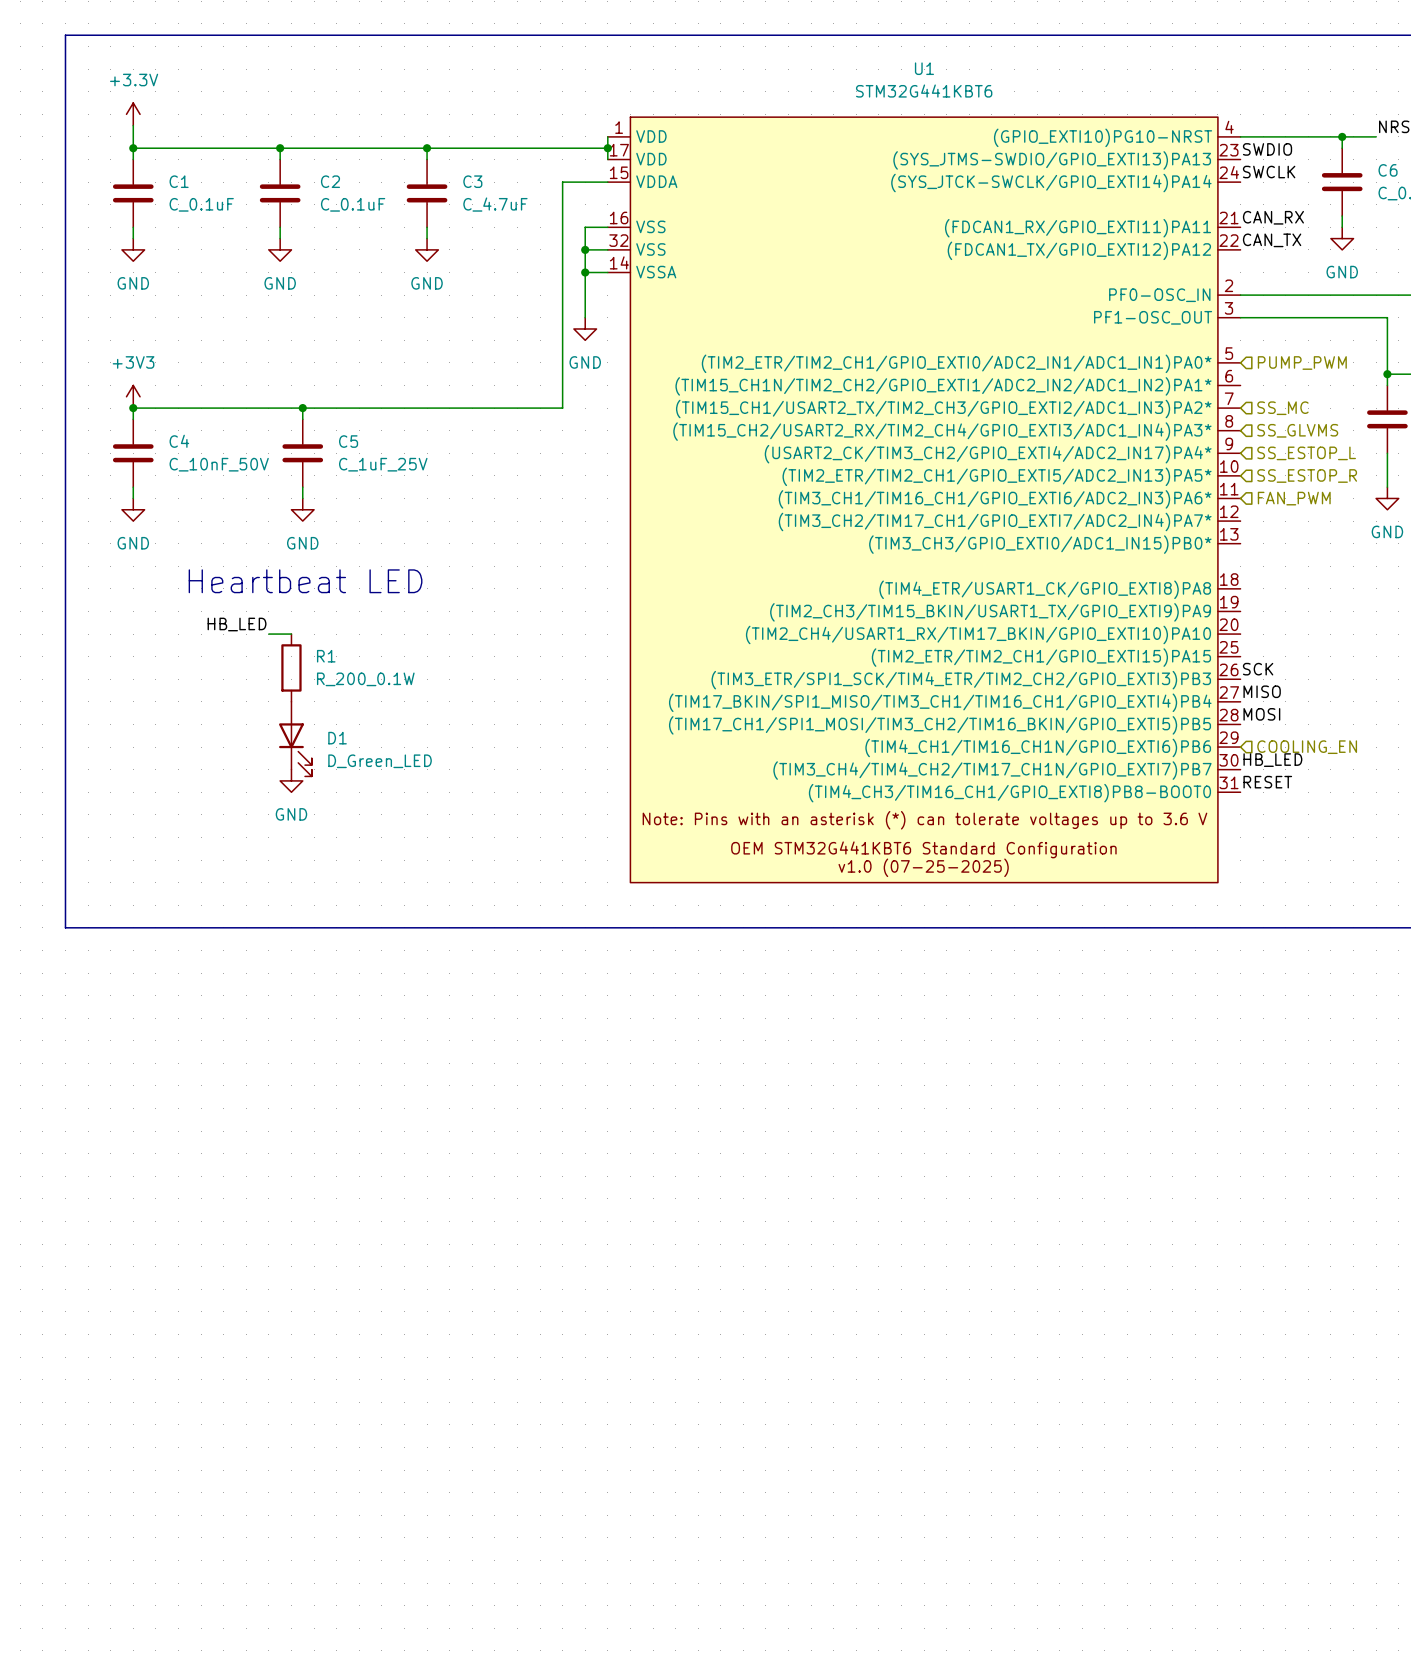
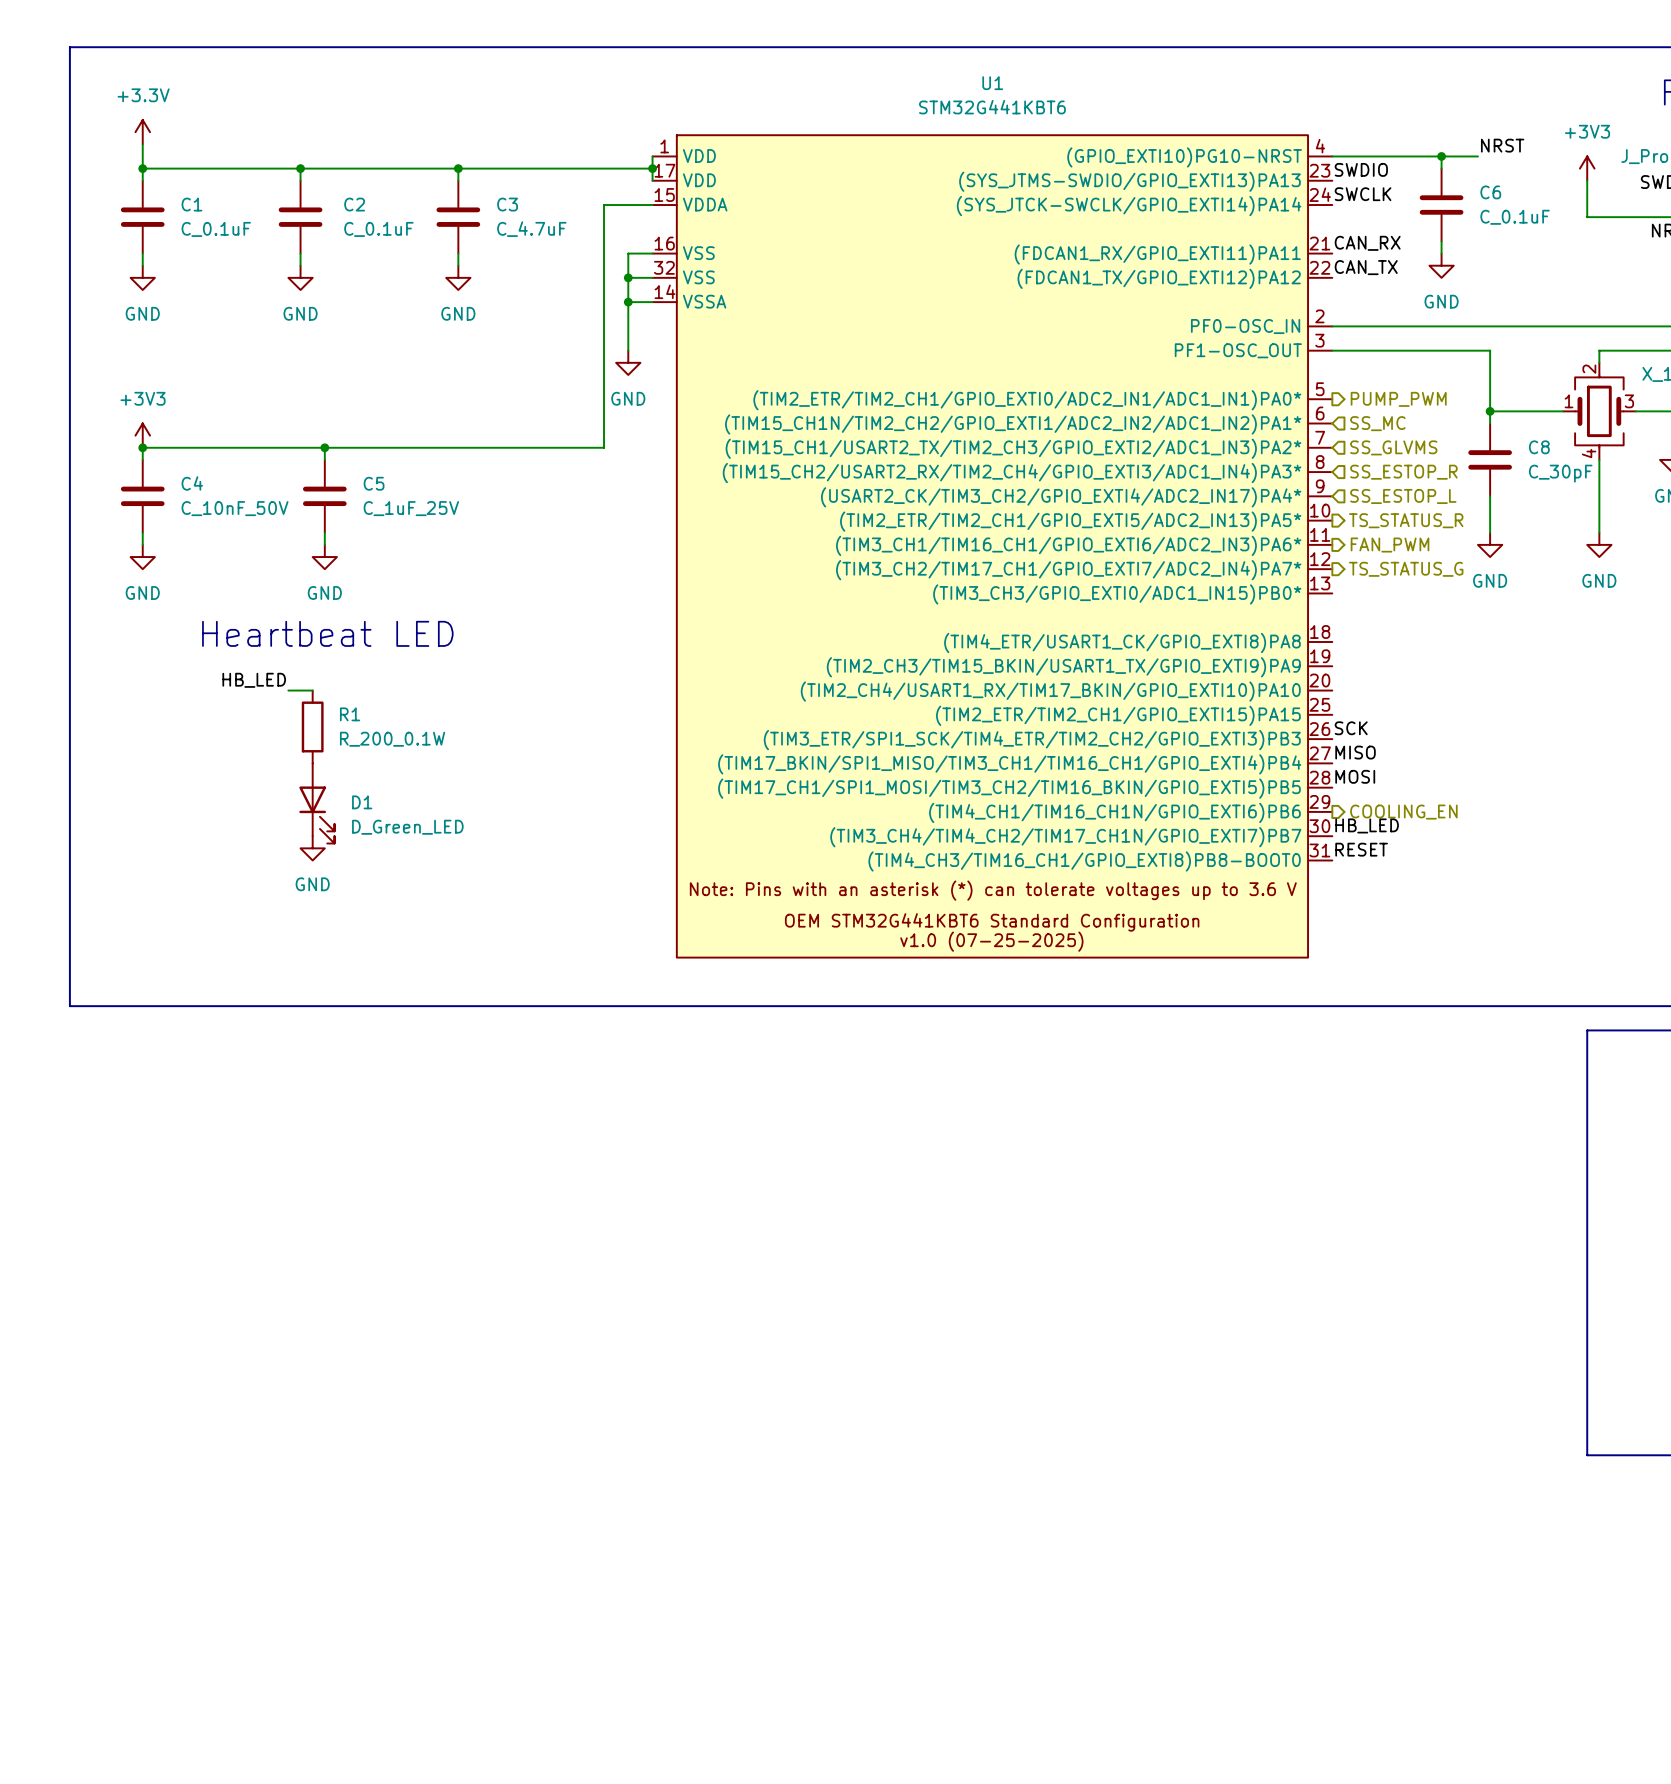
hierarchical label shape: input (1302, 363) -> output (1398, 399)
hierarchical label: none -> SS_MC (1377, 423)
hierarchical label: SS_MC (1282, 408) -> SS_GLVMS (1393, 447)
hierarchical label: SS_GLVMS (1297, 430) -> SS_ESTOP_R (1403, 472)
hierarchical label shape: input (1307, 475) -> output (1406, 520)
hierarchical label: SS_ESTOP_R (1307, 475) -> TS_STATUS_R (1406, 520)
hierarchical label shape: input (1294, 498) -> output (1390, 545)
hierarchical label: none -> TS_STATUS_G (1406, 569)
hierarchical label shape: input (1307, 747) -> output (1403, 812)

